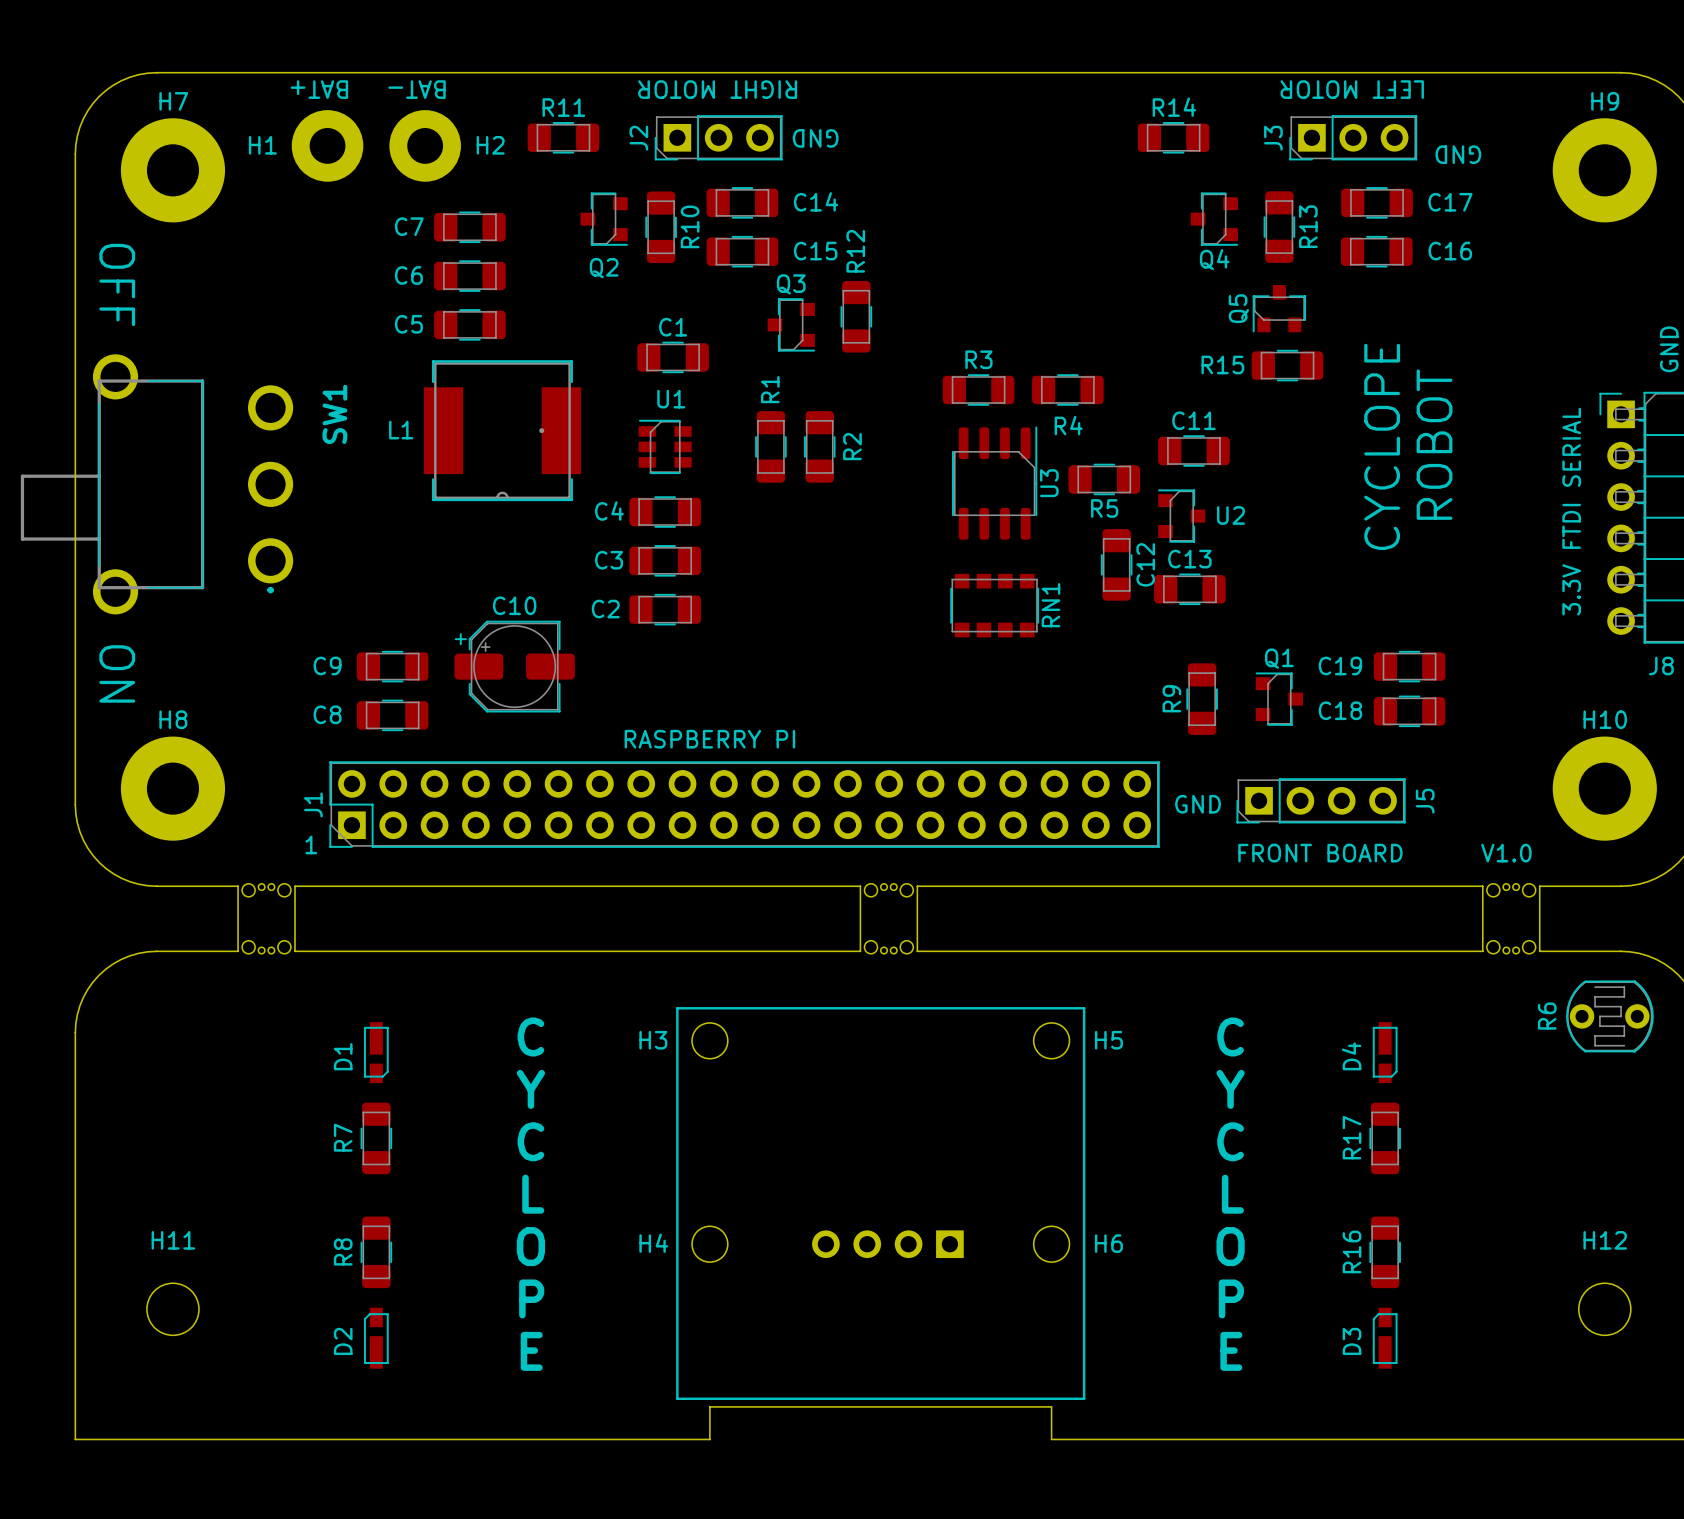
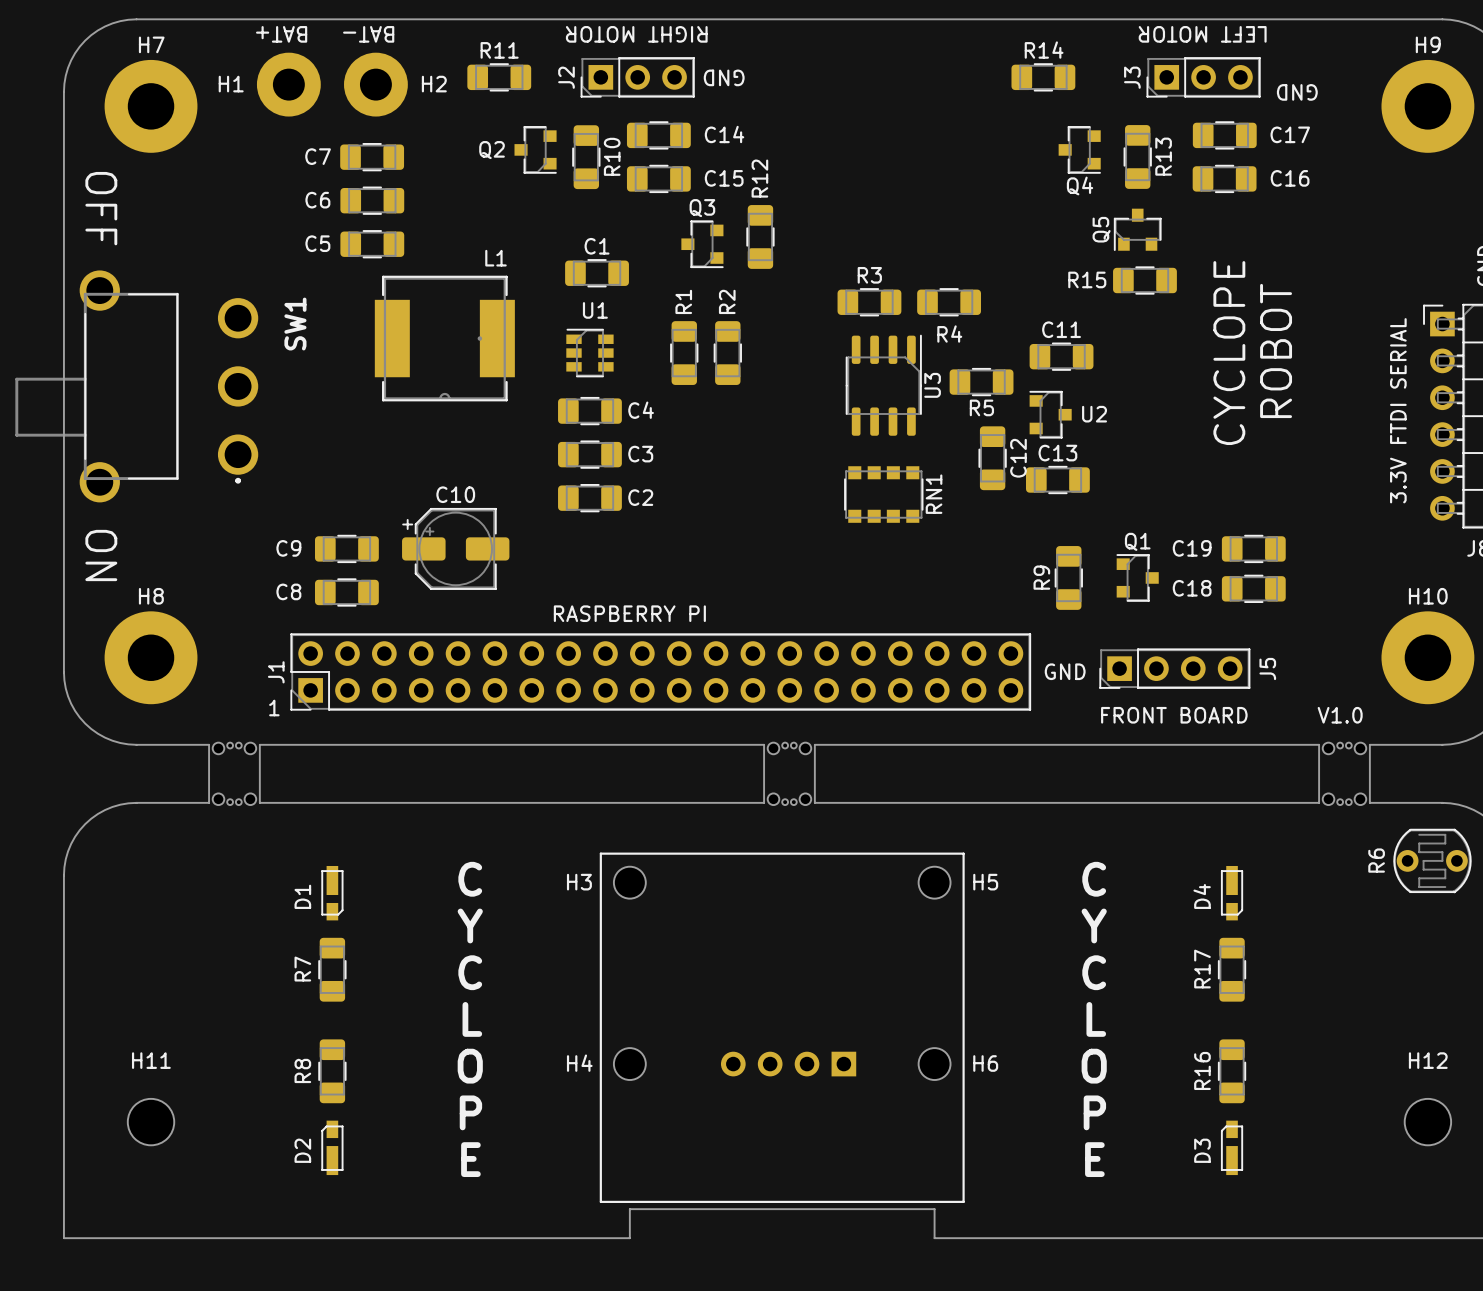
C7 position: (469, 227) -> (372, 157)
Q2 name position: Q2 (604, 268) -> Q2 (492, 150)
C6 position: (469, 276) -> (372, 200)
C5 position: (469, 324) -> (372, 244)
L1 name position: L1 (401, 430) -> L1 (495, 258)
R2 name position: R2 (852, 446) -> R2 (727, 301)
C4 name position: C4 (609, 511) -> C4 (641, 410)
C3 name position: C3 (609, 560) -> C3 (640, 454)
C2 name position: C2 (605, 609) -> C2 (640, 497)

